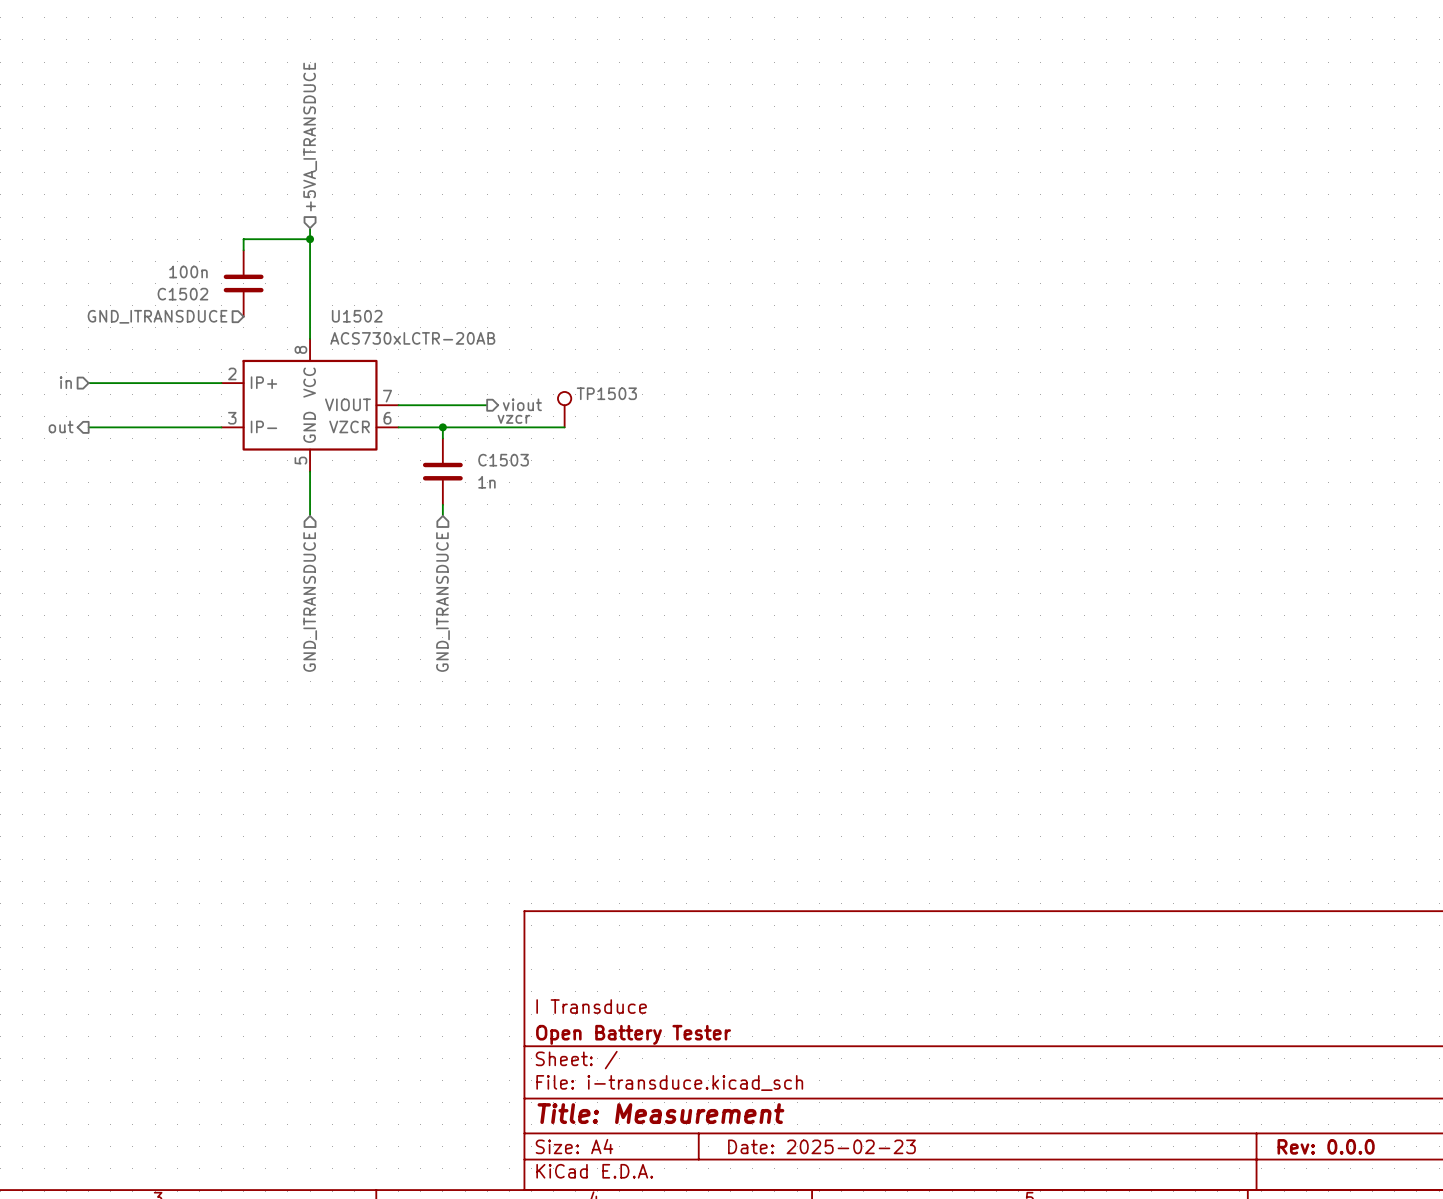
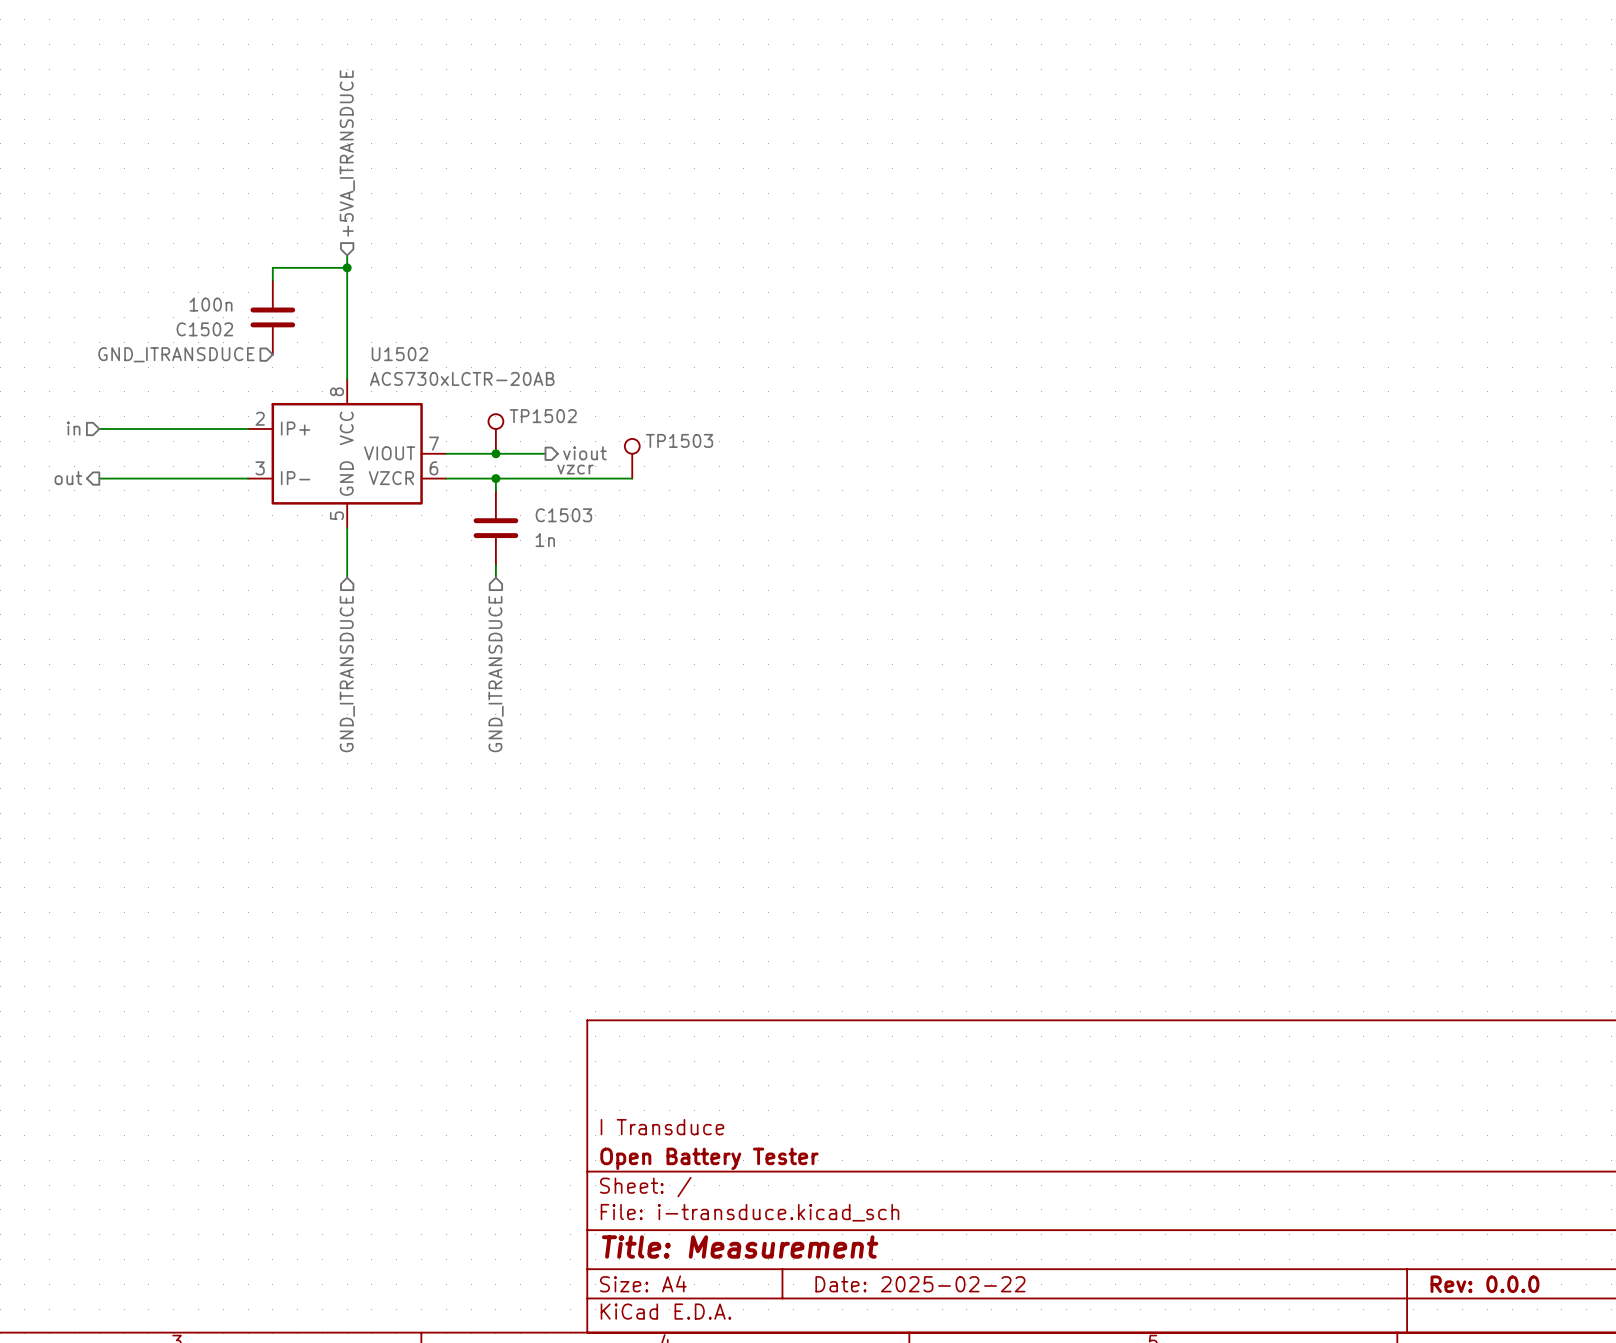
TP1502: none -> (495, 433)
junction: none -> (495, 453)
title block: Date: 2025-02-23 (821, 1146) -> Date: 2025-02-22 (920, 1284)

